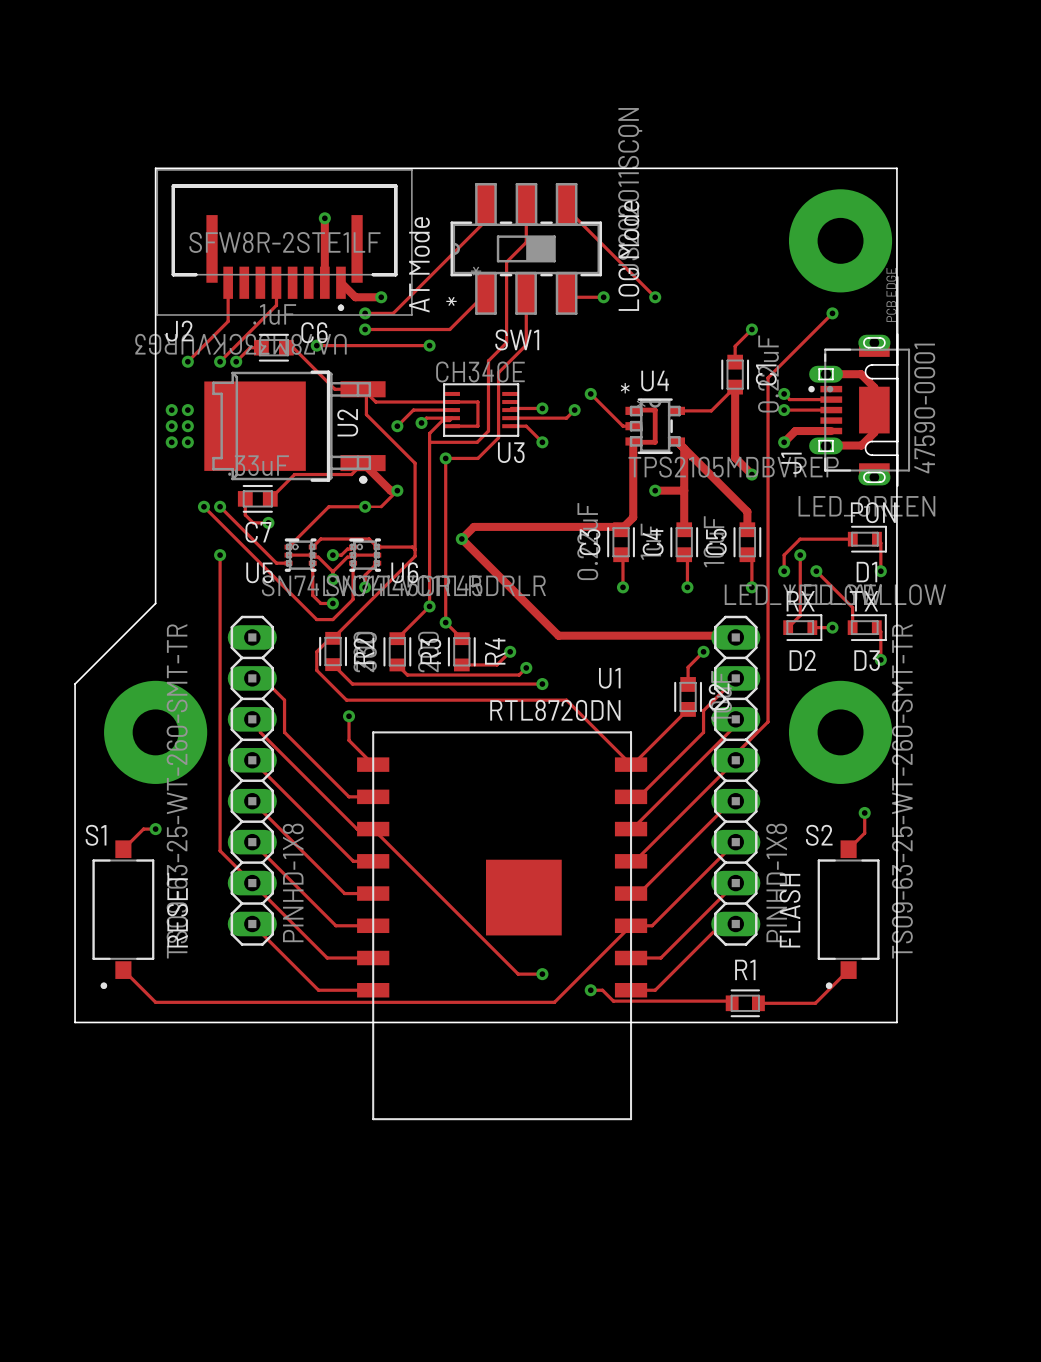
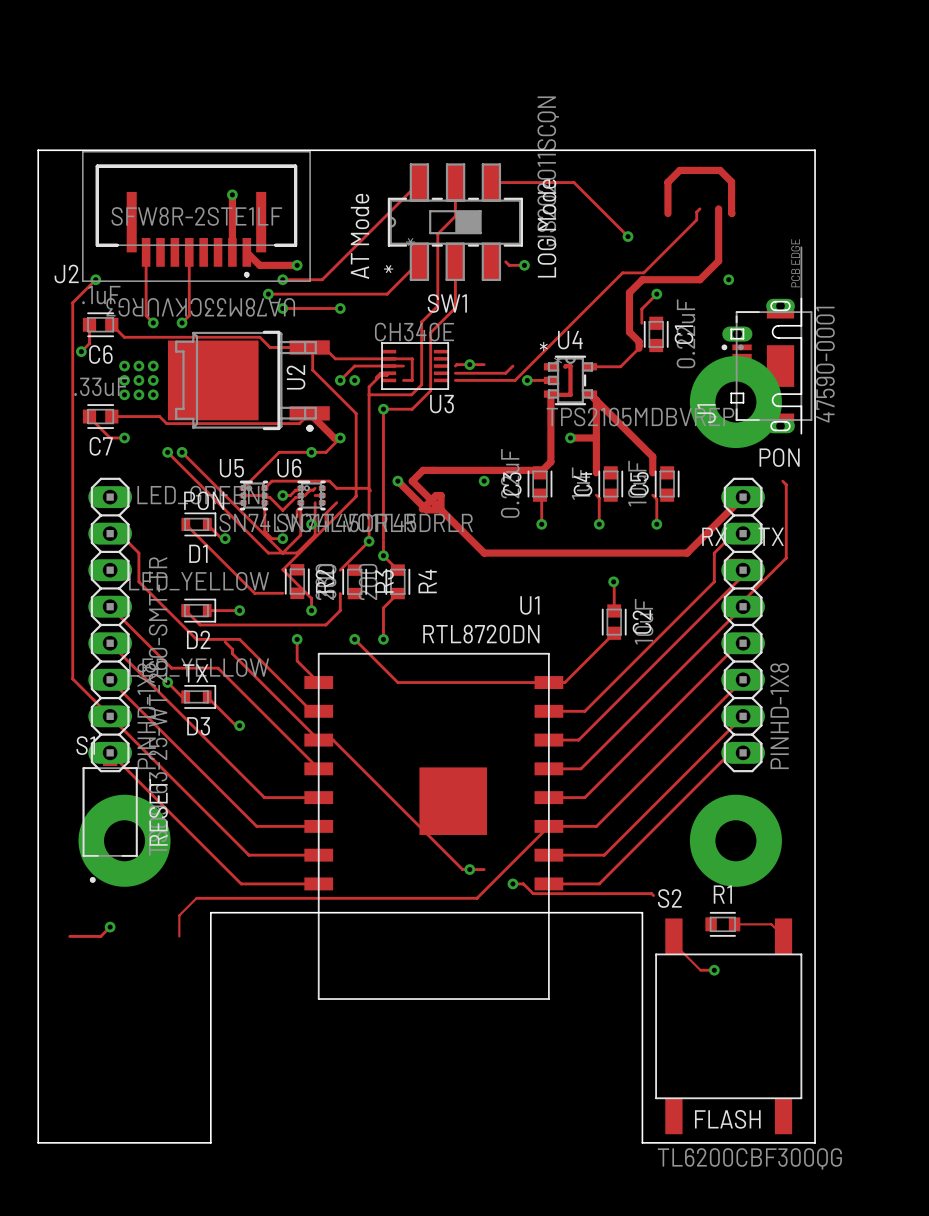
board edge: (155, 168) (155, 603) (75, 684) (75, 1022) (236, 1022) -> (138, 150) (38, 150) (38, 1142) (210, 1142) (210, 912)
board edge: (896, 168) (896, 1022) (719, 1022) -> (800, 150) (815, 150) (815, 1142) (642, 1142) (642, 912)
track: none -> (419, 182) (322, 279) (282, 279)
track: (486, 204) (486, 220) (393, 313) (365, 313) -> none
track: (526, 204) (526, 242) (506, 262) (506, 342) (488, 360) (488, 431) (477, 442) (461, 442) -> (455, 182) (455, 216) (437, 233) (437, 305) (421, 322) (421, 384) (411, 394)
track: none -> (491, 182) (573, 182) (628, 236)
track: (566, 204) (566, 208) (655, 297) -> none
via: none -> (232, 194)
track: (324, 218) (324, 282) -> (232, 194) (232, 252)
via: (324, 218) -> none
track: none -> (718, 208) (718, 261) (699, 279) (642, 279) (629, 292) (629, 332) (639, 341) (639, 348)
track: none -> (667, 213) (667, 182) (679, 170) (720, 170) (731, 181) (731, 213)
via: (840, 240) -> none
J2 position: (284, 242) -> (196, 216)
SW1 position: (526, 248) -> (455, 222)
text position: LOG Mode (628, 255) -> LOG Mode (546, 228)
text position: AT Mode (419, 264) -> AT Mode (360, 236)
via: none -> (628, 236)
track: none -> (146, 252) (146, 315) (153, 322)
track: none -> (189, 252) (189, 315) (182, 322)
track: (228, 282) (228, 321) (187, 361) -> none
track: (276, 282) (276, 305) (220, 361) -> (246, 252) (259, 265) (297, 265)
track: (340, 282) (355, 297) (381, 297) -> none
track: (486, 293) (449, 329) (433, 329) -> (419, 261) (387, 294)
track: (526, 293) (526, 344) (498, 372) (498, 437) (477, 458) (461, 458) -> (455, 261) (455, 307) (430, 332) (430, 390) (412, 409)
via: none -> (297, 265)
via: (381, 297) -> none
track: (587, 297) (603, 297) -> (590, 366) (604, 366)
via position: (603, 297) -> (524, 265)
via: (655, 297) -> none
via: none -> (95, 279)
via: none -> (282, 279)
via: (365, 313) -> none
track: (832, 313) (768, 377) (768, 721) (732, 757) (735, 760) (634, 861) -> (786, 509) (786, 558) (743, 601) (743, 606) (580, 768) (566, 768)
via position: (832, 313) -> (728, 279)
track: none -> (268, 294) (325, 294)
via: none -> (268, 294)
via: (365, 329) -> none
track: (751, 329) (735, 346) (735, 362) -> (656, 294) (641, 309) (641, 323)
via position: (751, 329) -> (656, 294)
J2 name position: J2 (179, 331) -> J2 (66, 273)
C6 name position: C6 (314, 332) -> C6 (100, 354)
track: (381, 345) (429, 345) -> none
via: none -> (340, 308)
via: (429, 345) -> none
track: (261, 347) (250, 347) (236, 361) -> none
C6 position: (273, 347) -> (100, 324)
track: (286, 347) (293, 347) (334, 389) -> (111, 324) (124, 337) (259, 337) (270, 347) (298, 347)
via: none -> (153, 322)
via: (187, 361) -> none
via: none -> (182, 322)
via: (220, 361) -> none
via: (236, 361) -> none
track: none -> (89, 324) (89, 343) (81, 351)
track: (826, 374) (861, 374) (874, 387) (874, 432) (861, 445) (826, 445) -> none
track: none -> (312, 350) (312, 370) (356, 413) (356, 496) (282, 569) (311, 598) (311, 610)
track: (366, 392) (366, 414) (415, 463) (415, 556) (333, 638) (330, 638) (316, 651) (316, 670) (346, 700) -> (185, 610) (200, 624) (309, 624)
via: none -> (81, 351)
track: (590, 393) (622, 426) (633, 426) -> none
via: (590, 393) -> none
track: (784, 393) (789, 399) (831, 399) -> none
via: (784, 393) -> none
track: (461, 402) (477, 402) (477, 426) (461, 426) -> (412, 358) (412, 380)
via position: (542, 408) -> (469, 364)
via: none -> (124, 366)
via: none -> (138, 366)
via: (187, 410) -> none
track: (413, 410) (397, 426) -> (369, 366) (354, 366) (340, 380)
U3 position: (481, 410) -> (415, 366)
via: (574, 410) -> none
track: (639, 410) (655, 410) (655, 442) (639, 442) -> (570, 366) (570, 394)
track: (695, 410) (711, 410) (735, 387) (735, 457) (751, 474) -> (620, 366) (641, 345)
track: (784, 410) (831, 410) -> none
via: (784, 410) -> none
track: (435, 418) (451, 418) (449, 420) (442, 420) (429, 433) (429, 458) -> (397, 409) (383, 409)
track: none -> (389, 373) (386, 375) (380, 375) (369, 386) (369, 541) (340, 570)
via: (421, 422) -> none
via: none -> (124, 380)
via: none -> (138, 380)
via: (187, 426) -> none
via: none -> (340, 380)
track: (526, 426) (542, 442) -> (469, 380) (515, 380) (622, 272) (643, 272) (696, 219) (696, 212) (699, 208)
track: none -> (527, 380) (550, 380)
via: none -> (527, 380)
U4 position: (655, 426) -> (570, 380)
U2 position: (294, 427) -> (248, 381)
track: (831, 431) (795, 431) (784, 442) -> none
track: (677, 441) (747, 511) (747, 529) -> (590, 394) (652, 456) (652, 472)
via: none -> (124, 394)
via: none -> (138, 394)
via: (187, 442) -> none
track: none -> (369, 394) (383, 394)
via: (542, 442) -> none
track: (634, 442) (633, 517) (621, 529) (618, 526) (602, 526) -> (565, 394) (550, 394) (550, 461) (539, 472) (537, 470)
via: (784, 442) -> none
track: (684, 448) (684, 529) -> (596, 400) (596, 472)
via: none -> (735, 402)
track: (445, 458) (445, 622) (461, 638) -> none
via position: (445, 458) -> (383, 409)
track: none -> (89, 416) (110, 437) (124, 437)
track: (294, 474) (270, 498) -> (262, 423) (166, 423) (159, 416) (111, 416)
track: (335, 474) (351, 474) (363, 463) (390, 490) (397, 490) (381, 506) (365, 506) -> (299, 423) (309, 413) (334, 437) (340, 437) (325, 452)
via: (751, 474) -> none
via: none -> (124, 437)
via: none -> (340, 437)
via: (397, 490) -> none
via position: (655, 490) -> (570, 437)
track: (668, 490) (684, 490) -> (570, 437) (584, 437)
track: (245, 498) (245, 514) (253, 522) (268, 522) -> none
C7 position: (257, 498) -> (100, 416)
track: none -> (167, 452) (268, 553) (282, 553) (300, 535) (300, 502)
via: none -> (167, 452)
track: (220, 506) (276, 563) (288, 563) -> none
via: (220, 506) -> none
track: (328, 506) (288, 547) -> (293, 452) (279, 452) (243, 488)
via: none -> (311, 452)
via: (365, 506) -> none
via: (268, 522) -> none
track: (320, 539) (312, 547) -> (286, 481) (271, 481) (264, 488)
track: none -> (397, 481) (426, 509) (441, 509) (441, 495) (435, 495) (422, 509)
via position: (461, 539) -> (397, 481)
via: none -> (484, 481)
track: (852, 539) (800, 539) (784, 555) (784, 571) -> none
D1 position: (867, 539) -> (198, 524)
C3 position: (621, 542) -> (539, 484)
track: none -> (300, 488) (290, 495) (282, 495)
track: (621, 554) (622, 556) (622, 587) -> (539, 495) (541, 496) (541, 524)
track: (684, 554) (687, 557) (687, 587) -> (596, 495) (599, 498) (599, 524)
track: (747, 554) (751, 559) (751, 587) -> (652, 495) (656, 499) (656, 524)
track: (220, 555) (220, 850) (327, 958) -> (95, 279) (72, 302) (72, 678) (248, 855) (292, 855)
via: (220, 555) -> none
track: (296, 555) (318, 557) (332, 571) (347, 557) (353, 555) -> (264, 495) (269, 497) (282, 510) (295, 497) (300, 495)
U5 position: (300, 555) -> (254, 495)
via: none -> (282, 495)
via: (332, 555) -> none
track: (361, 555) (377, 555) -> (243, 495) (257, 495)
U6 position: (365, 555) -> (311, 495)
track: (800, 555) (800, 615) (788, 627) -> none
via: (800, 555) -> none
text: none -> PON (204, 500)
track: (312, 563) (312, 595) (320, 603) (332, 603) -> (264, 502) (264, 531) (271, 538) (282, 538)
via: (784, 571) -> none
track: (816, 571) (852, 607) (852, 627) -> none
via: (816, 571) -> none
via: (880, 571) -> none
U5 name position: U5 (259, 572) -> U5 (231, 468)
U6 name position: U6 (404, 572) -> U6 (289, 468)
via: (332, 579) -> none
track: none -> (185, 524) (254, 593) (282, 593)
track: none -> (207, 524) (221, 538) (225, 538)
via: none -> (311, 524)
via: (365, 587) -> none
via position: (622, 587) -> (541, 524)
via position: (687, 587) -> (599, 524)
via position: (751, 587) -> (656, 524)
via: none -> (225, 538)
via: none -> (282, 538)
via: (332, 603) -> none
via: none -> (369, 541)
track: (429, 606) (397, 638) -> (383, 541) (383, 555) (397, 570)
via: (429, 606) -> none
track: (542, 619) (558, 635) (734, 635) (735, 637) -> (484, 553) (687, 553) (743, 497)
via: none -> (383, 555)
via: (445, 622) -> none
D2 position: (802, 627) -> (198, 610)
via: (832, 627) -> none
D3 position: (867, 627) -> (198, 696)
track: (876, 627) (880, 631) (880, 659) -> none
R4 position: (461, 651) -> (397, 581)
track: (510, 651) (497, 664) (461, 664) -> none
via: (510, 651) -> none
track: (703, 651) (688, 667) -> (613, 581) (614, 595)
via position: (703, 651) -> (613, 581)
via: (880, 659) -> none
track: (333, 664) (352, 684) (542, 684) -> none
track: none -> (340, 593) (340, 610) (325, 624)
track: (397, 664) (407, 675) (519, 675) (526, 667) -> none
track: none -> (397, 593) (383, 607) (383, 639)
via: (526, 667) -> none
track: (252, 678) (262, 678) (284, 700) (284, 732) -> (110, 533) (119, 533) (138, 553) (138, 581) (196, 639) (239, 639) (254, 653)
track: (735, 678) (703, 710) (703, 732) (639, 796) -> (743, 533) (733, 533) (714, 553) (714, 581) (584, 711) (570, 711)
track: none -> (110, 606) (171, 668) (218, 668) (318, 768)
track: none -> (207, 610) (239, 610)
via: none -> (239, 610)
via: none -> (311, 610)
via: (542, 684) -> none
track: (365, 700) (566, 700) (631, 764) -> (354, 639) (397, 682) (563, 682)
via: none -> (297, 639)
track: (349, 716) (349, 740) (373, 764) -> (297, 639) (297, 660) (318, 682)
via: (349, 716) -> none
via: none -> (354, 639)
via: none -> (383, 639)
track: (735, 719) (735, 725) (632, 829) -> (743, 570) (743, 575) (578, 740) (564, 740)
via: (155, 732) -> none
via: (840, 732) -> none
text: none -> TX (195, 673)
track: (252, 760) (353, 861) (373, 861) -> none
track: none -> (167, 682) (182, 696) (185, 696)
via: none -> (167, 682)
track: none -> (207, 696) (236, 725) (239, 725)
part position: (252, 780) -> (110, 624)
part position: (735, 780) -> (743, 624)
S2 value: TS09-63-25-WT-260-SMT-TR (902, 791) -> TL6200CBF300QG (749, 1158)
track: (252, 801) (344, 893) -> (110, 643) (264, 797) (307, 797)
track: (735, 801) (731, 801) (639, 893) -> (743, 643) (739, 643) (584, 797) (570, 797)
via: none -> (239, 725)
track: (864, 812) (864, 833) (848, 849) -> none
via: (864, 812) -> none
track: (155, 829) (143, 829) (123, 849) -> none
via: (155, 829) -> none
S2 name position: S2 (819, 835) -> S2 (669, 898)
S2 footprint: [817, 840, 880, 989] -> [655, 918, 803, 1135]
track: (252, 842) (335, 925) -> (110, 679) (256, 826) (299, 826)
track: (735, 842) (652, 925) -> (743, 679) (596, 826) (582, 826)
track: (735, 883) (660, 958) -> (743, 716) (604, 855) (589, 855)
text rotation: 0° (790, 910) -> 90° clockwise (727, 1119)
text position: FLASH (790, 910) -> FLASH (727, 1119)
track: (252, 924) (318, 990) -> (110, 752) (241, 883) (284, 883)
track: (735, 924) (721, 924) (655, 990) -> (743, 752) (730, 752) (599, 883) (584, 883)
U1 position: (502, 925) -> (433, 826)
track: (631, 925) (554, 1002) (155, 1002) (123, 970) -> (563, 826) (548, 826) (476, 898) (196, 898) (179, 915) (179, 936)
via: none -> (124, 840)
via: none -> (735, 840)
track: (848, 970) (815, 1003) (758, 1003) -> none
via position: (542, 974) -> (469, 869)
track: (590, 990) (602, 990) (613, 1001) -> (512, 883) (523, 883) (533, 893) (547, 893)
via position: (590, 990) -> (512, 883)
R1 position: (745, 1003) -> (722, 924)
track: none -> (734, 924) (771, 924) (783, 936)
track: none -> (110, 927) (100, 936) (69, 936)
via: none -> (110, 927)
track: none -> (673, 936) (673, 943) (700, 970) (714, 970)
via: none -> (714, 970)

